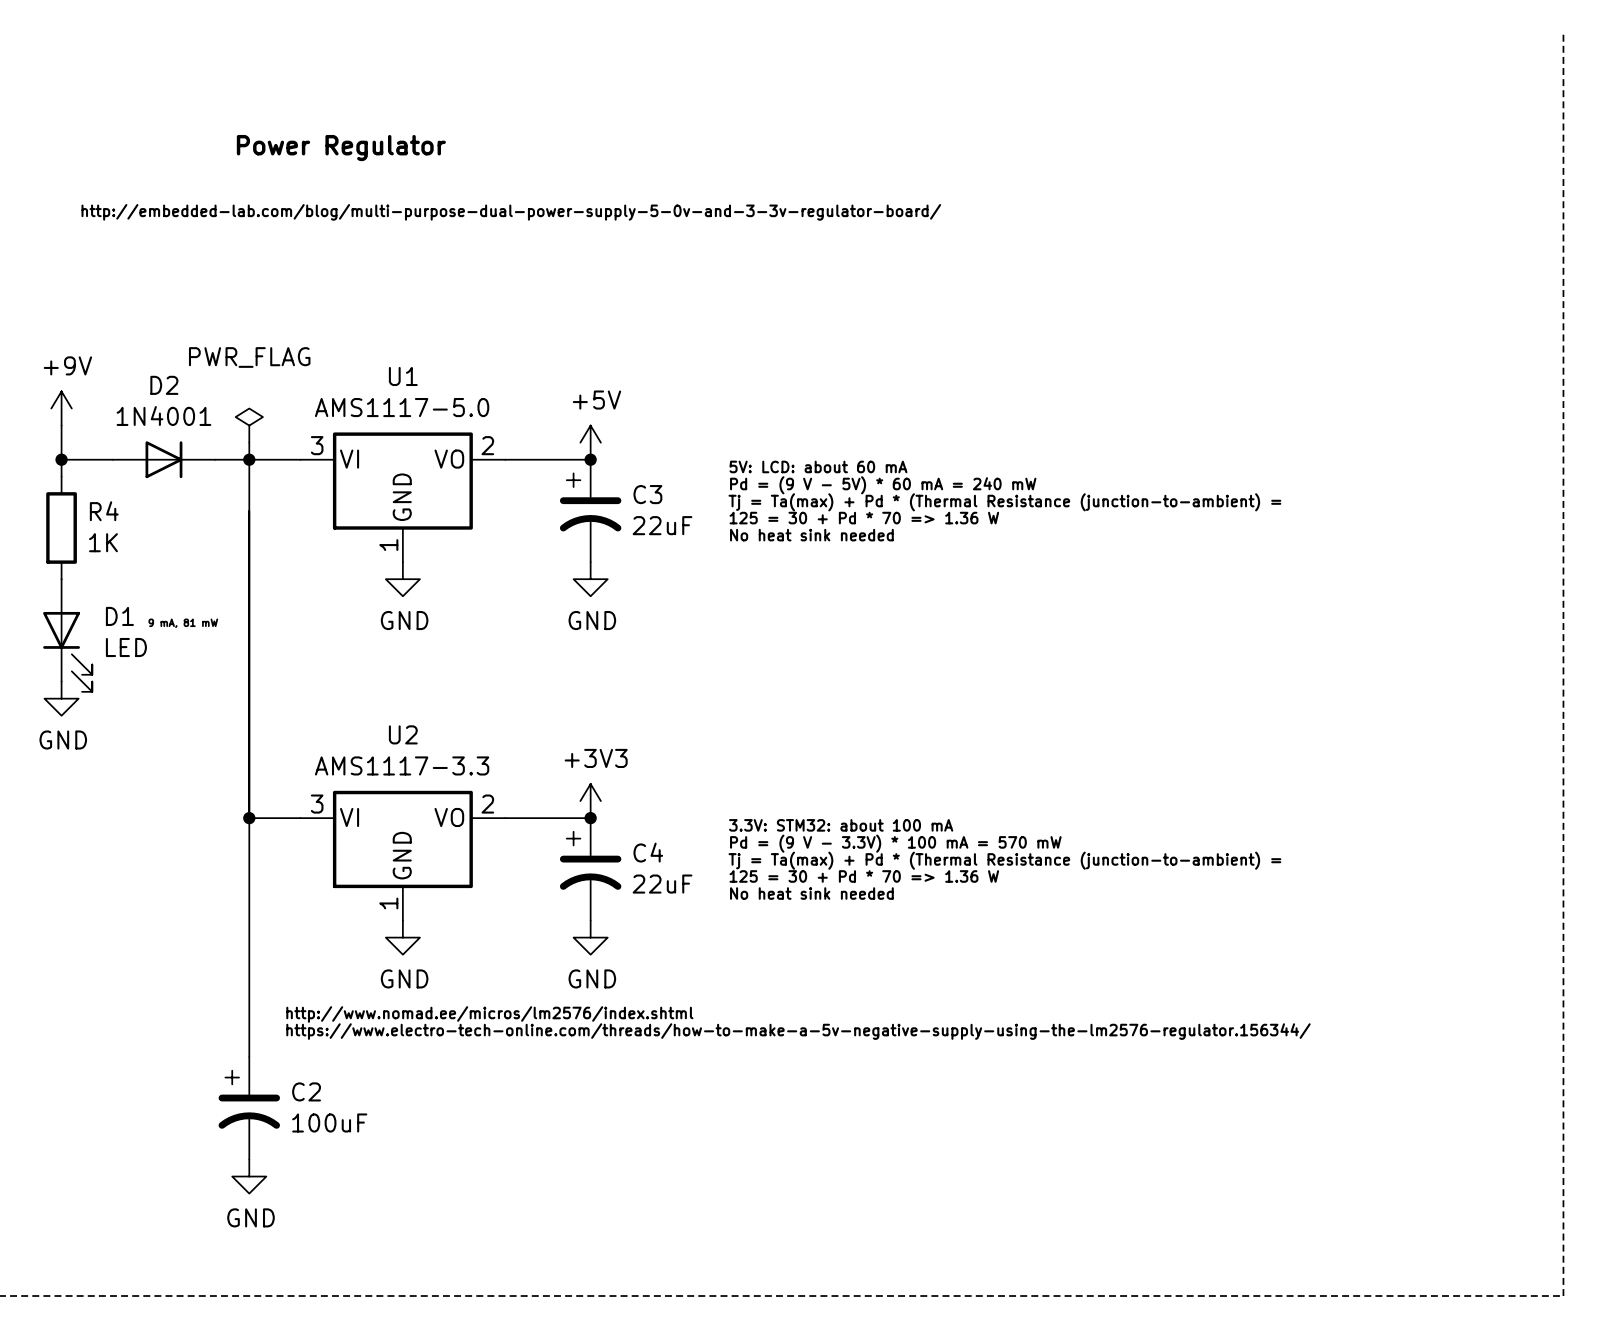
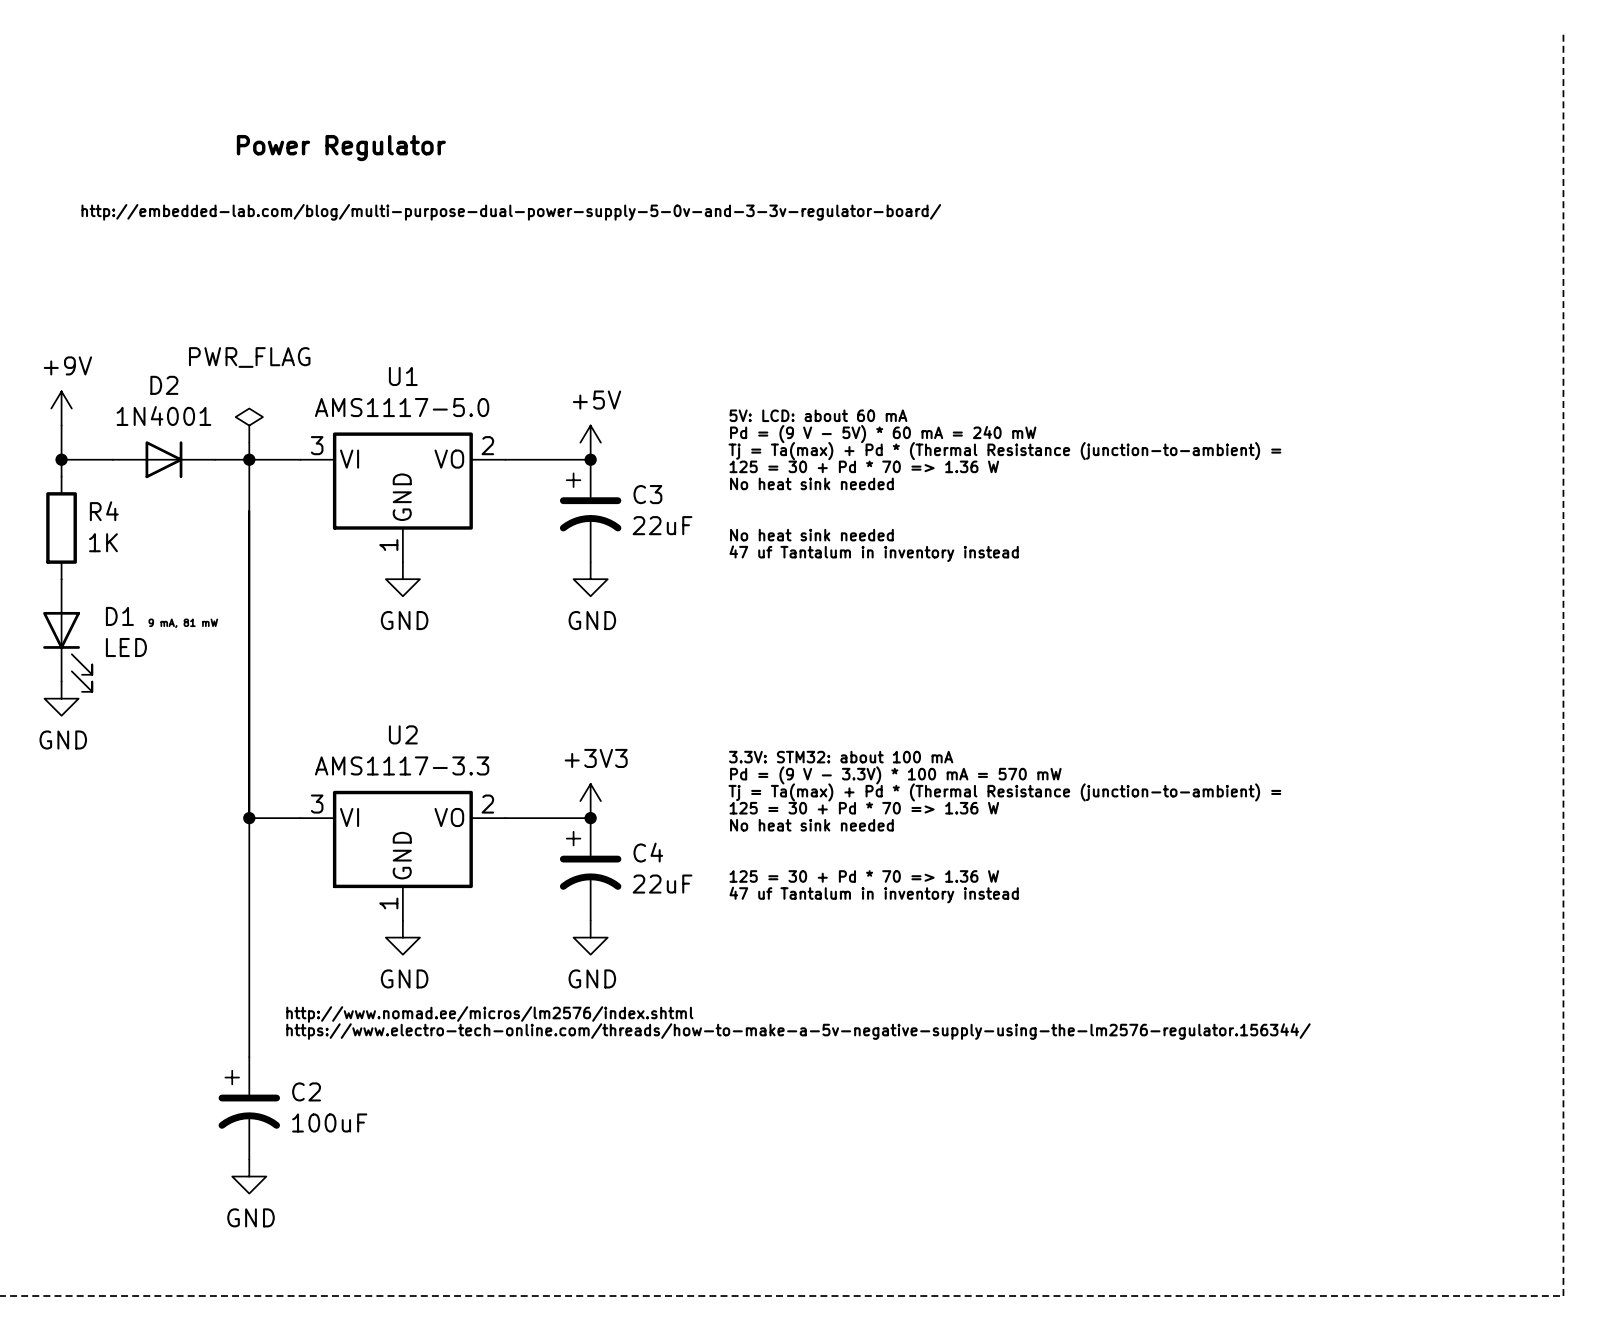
text: none -> 5V: LCD: about 60 mA (818, 415)
text: none -> Pd = (9 V - 5V) * 60 mA = 240 mW (883, 434)
text: 5V: LCD: about 60 mA (818, 466) -> 125 = 30 + Pd * 70 => 1.36 W (864, 466)
text: Pd = (9 V - 5V) * 60 mA = 240 mW (883, 485) -> No heat sink needed (811, 483)
text position: Tj = Ta(max) + Pd * (Thermal Resistance (junction-to-ambient) = (1004, 502) -> Tj = Ta(max) + Pd * (Thermal Resistance (junction-to-ambient) = (1004, 451)
text position: 125 = 30 + Pd * 70 => 1.36 W (864, 518) -> 125 = 30 + Pd * 70 => 1.36 W (864, 808)
text: none -> 47 uf Tantalum in inventory instead (874, 553)
text: none -> 3.3V: STM32: about 100 mA (841, 757)
text: 3.3V: STM32: about 100 mA (841, 825) -> No heat sink needed (811, 825)
text position: Pd = (9 V - 3.3V) * 100 mA = 570 mW (895, 843) -> Pd = (9 V - 3.3V) * 100 mA = 570 mW (895, 775)
text position: Tj = Ta(max) + Pd * (Thermal Resistance (junction-to-ambient) = (1004, 860) -> Tj = Ta(max) + Pd * (Thermal Resistance (junction-to-ambient) = (1004, 792)
text: No heat sink needed (811, 893) -> 47 uf Tantalum in inventory instead (874, 895)

